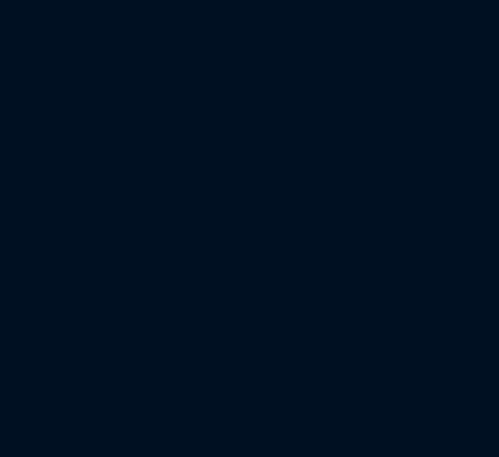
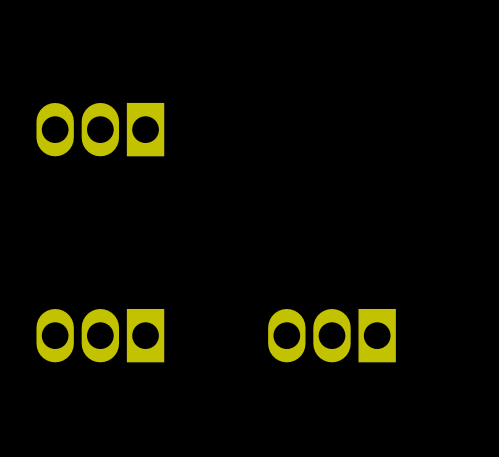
part: none -> (100, 129)
part: none -> (100, 335)
part: none -> (332, 335)

